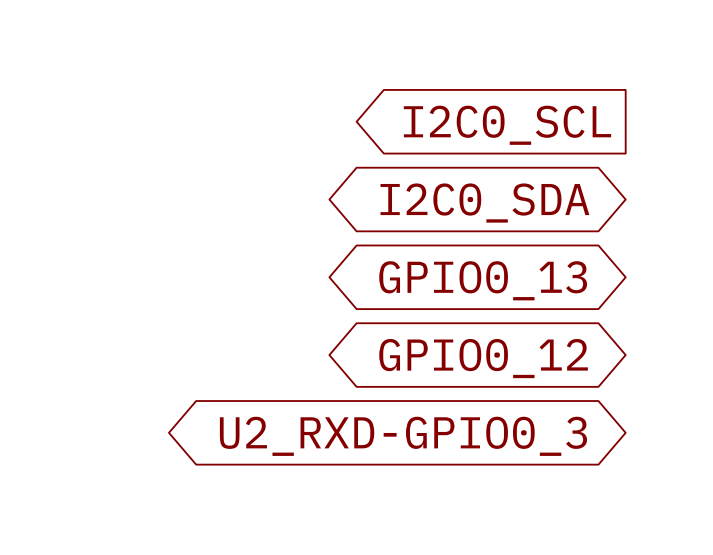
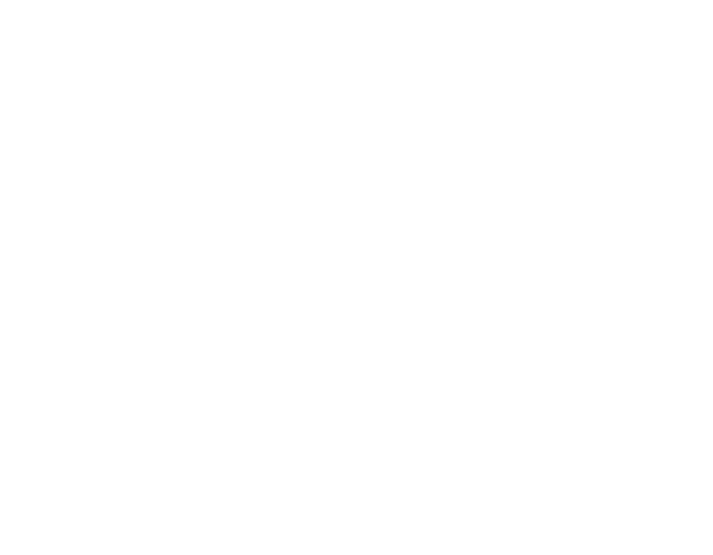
global label: I2C0_SCL (507, 125) -> none
global label: I2C0_SDA (484, 203) -> none
global label: GPIO0_13 (483, 280) -> none
global label: GPIO0_12 (483, 358) -> none
global label: U2_RXD-GPIO0_3 (403, 436) -> none

